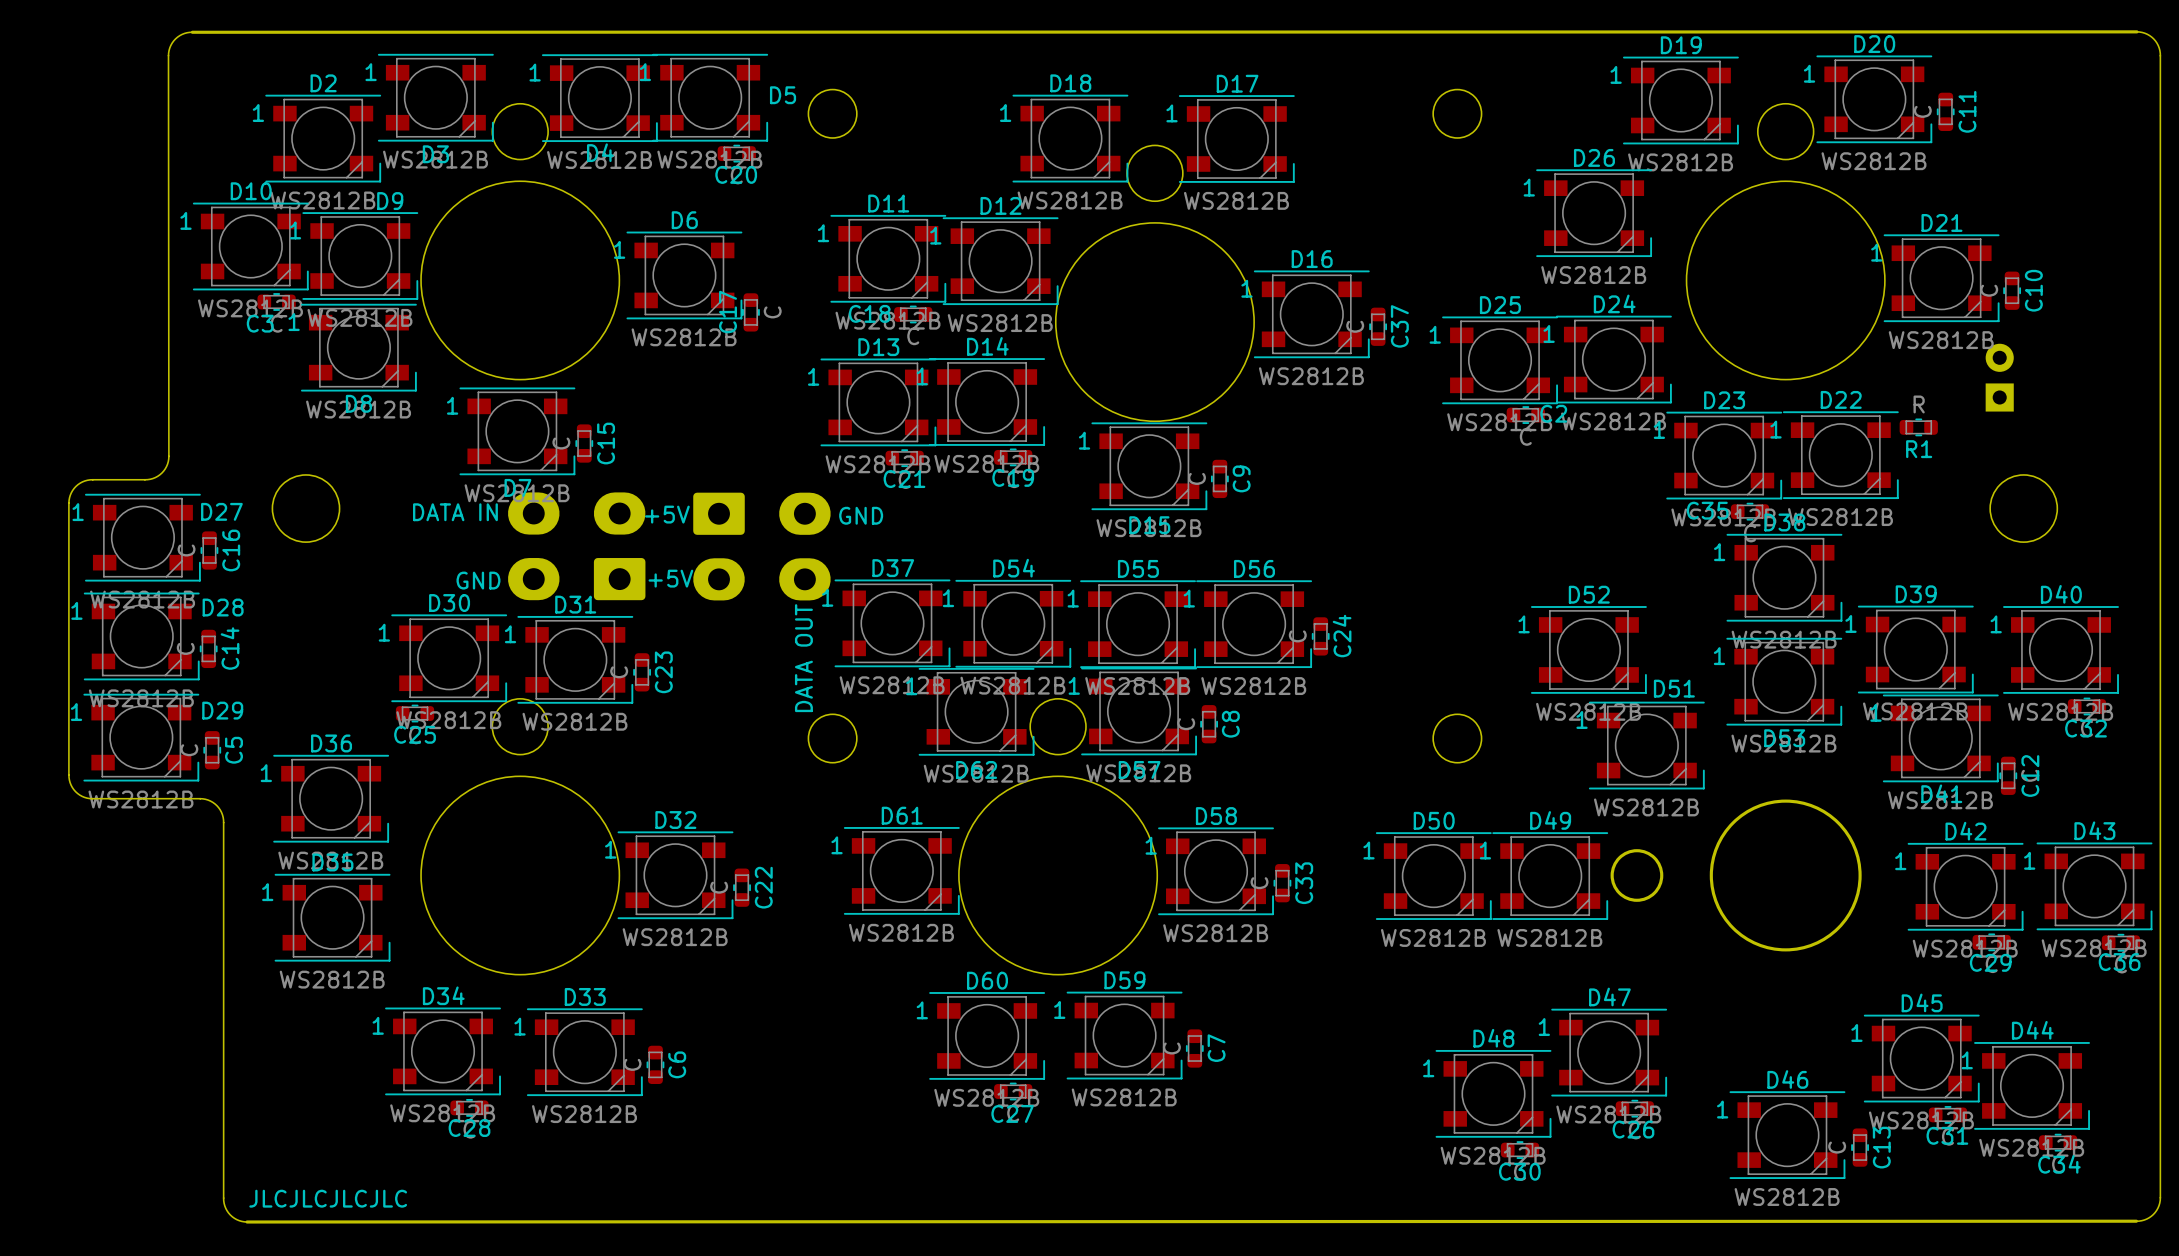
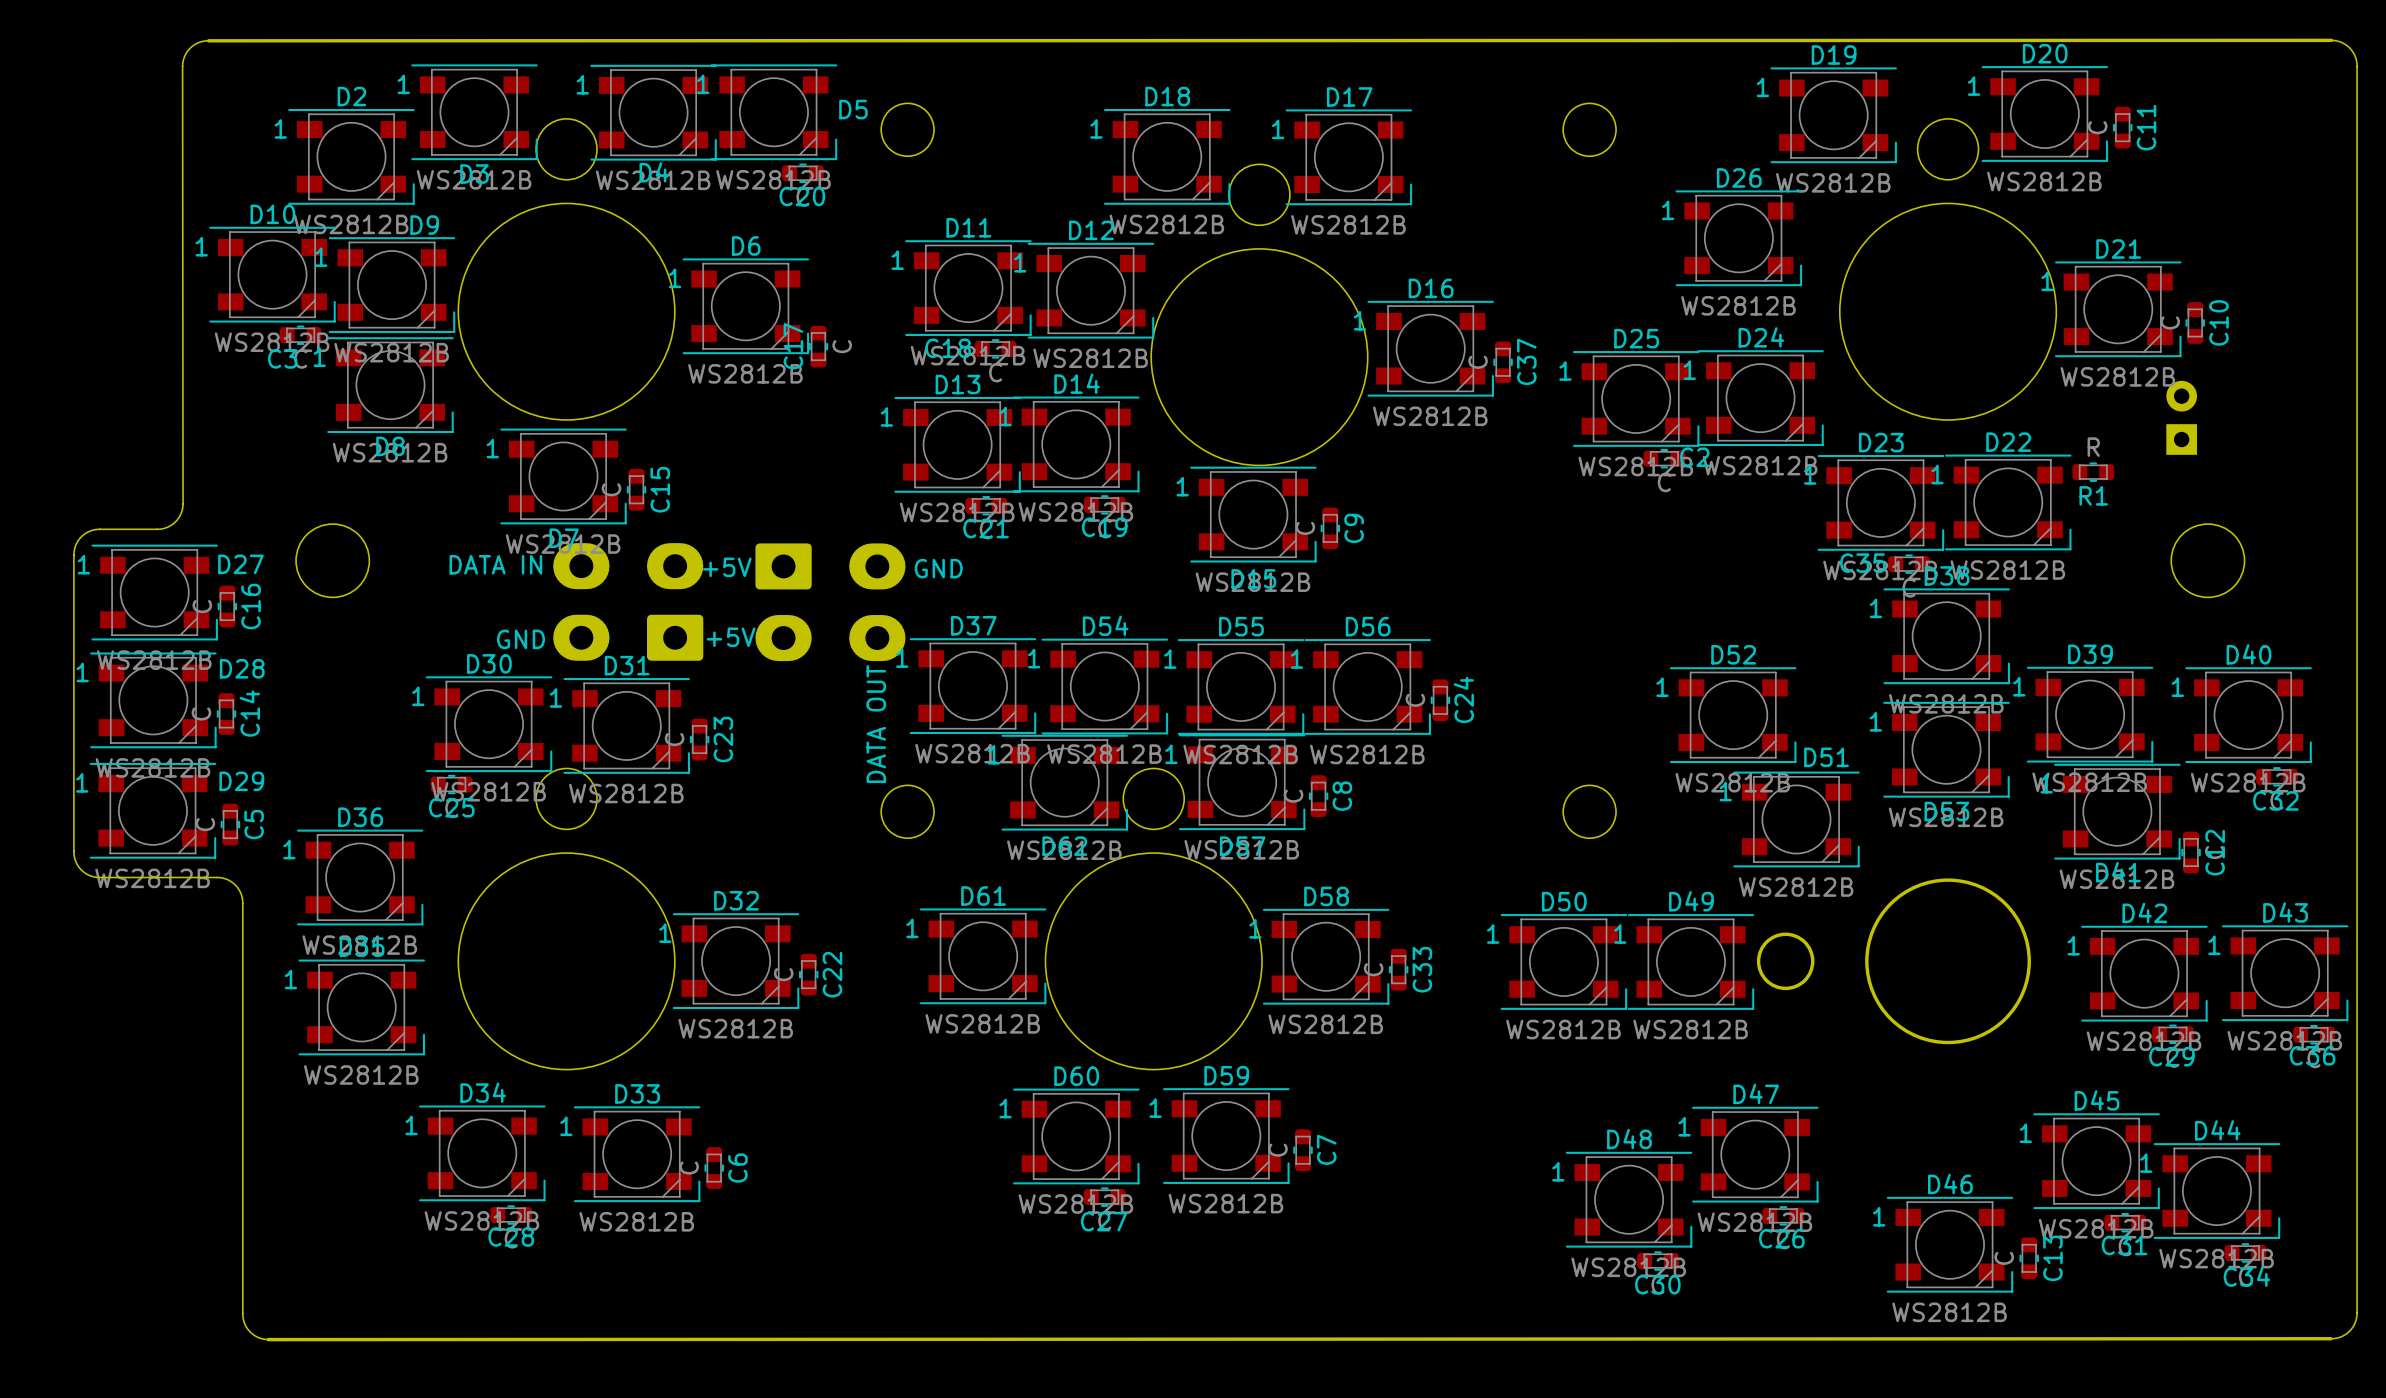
text: JLCJLCJLCJLC (328, 1198) -> none

